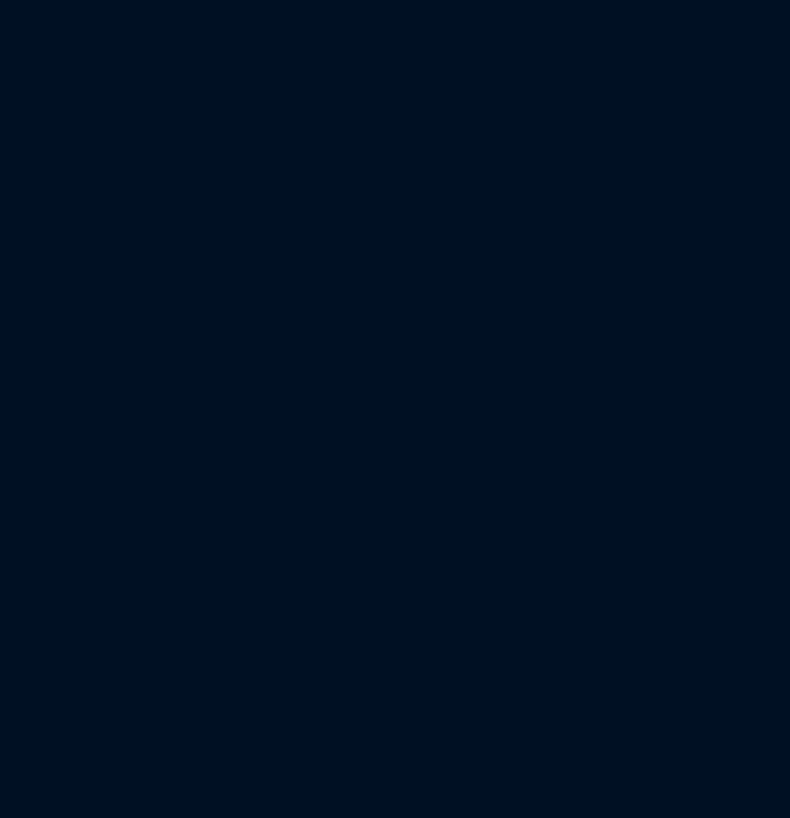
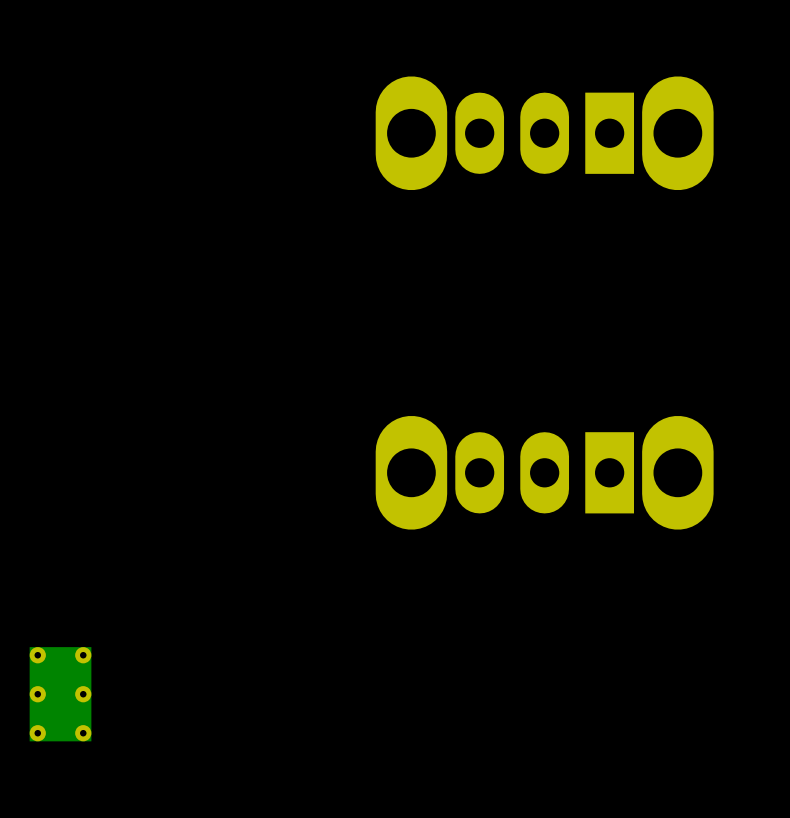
part: none -> (544, 133)
part: none -> (544, 472)
part: none -> (60, 694)

